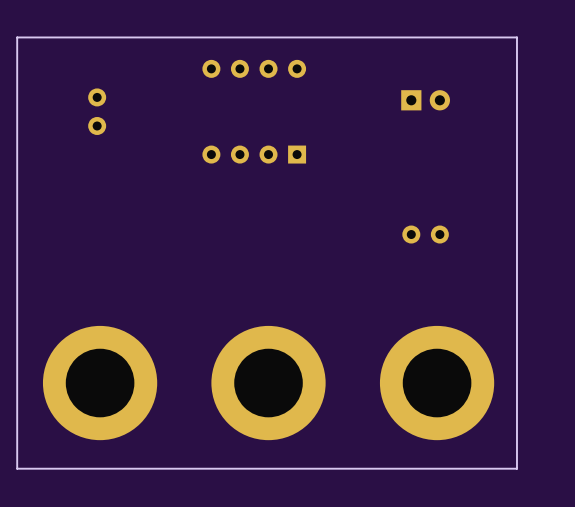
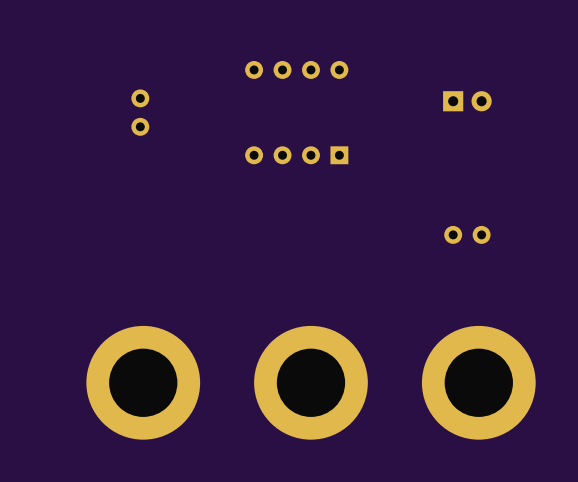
board edge: (516, 37) (516, 468) (17, 468) (17, 37) (516, 37) -> none

